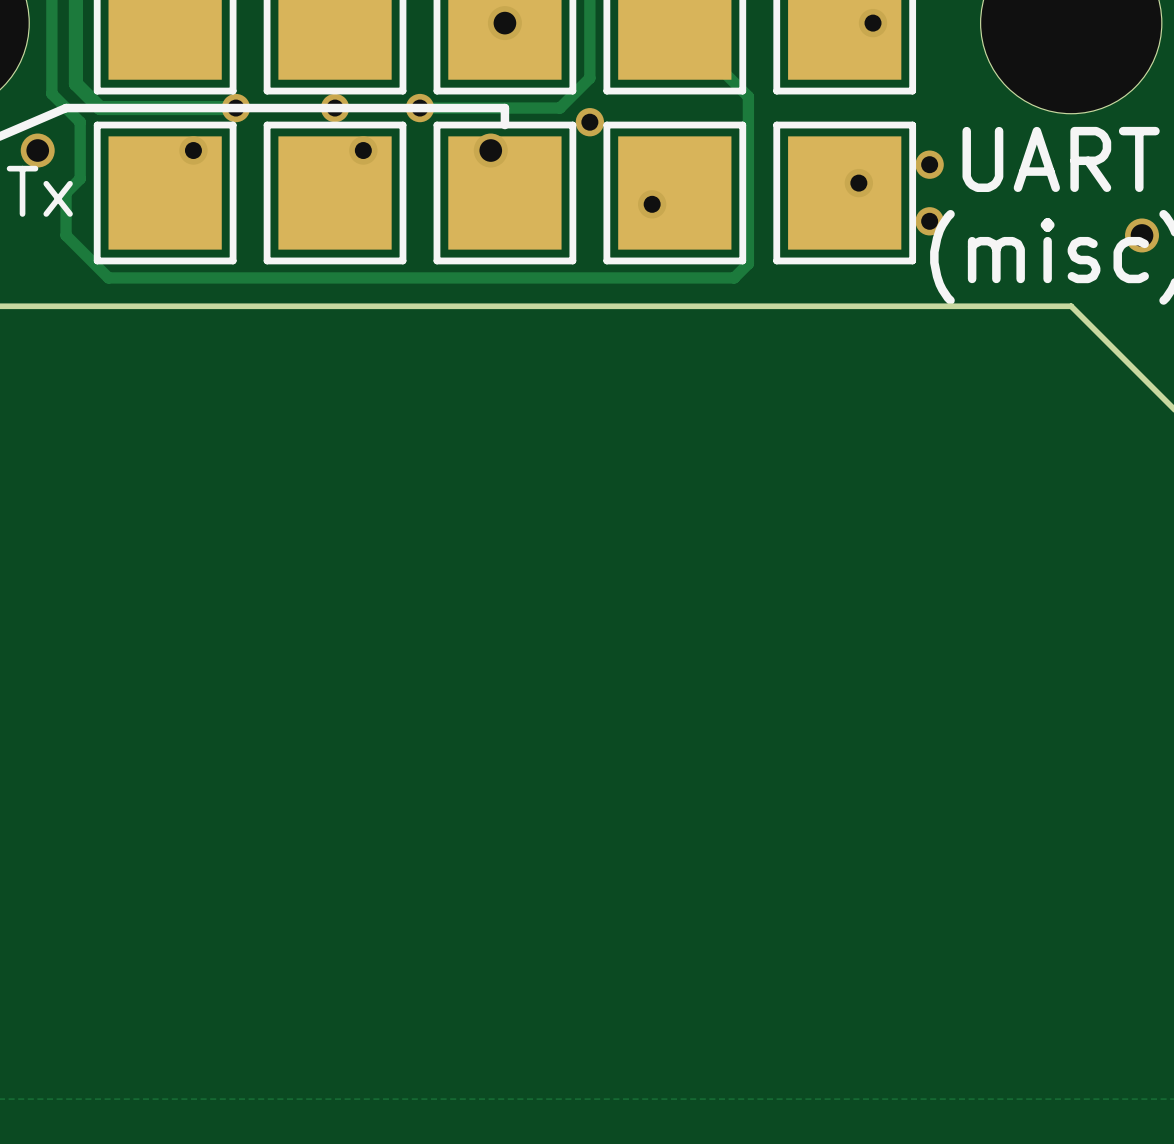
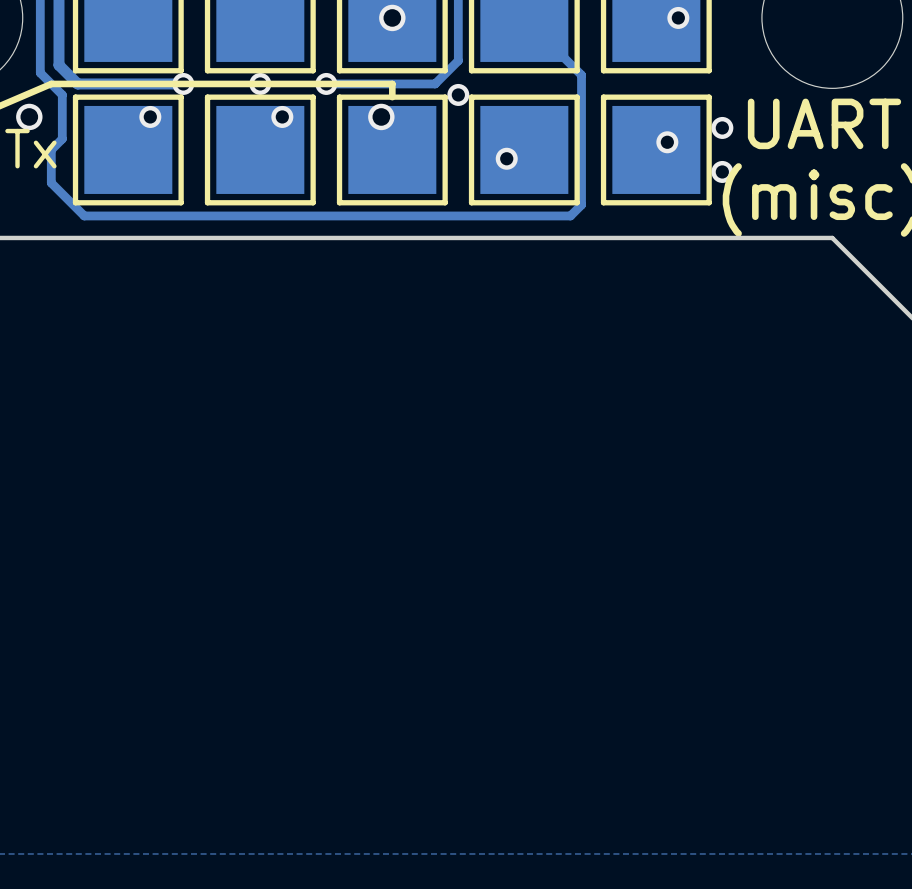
via: (1142, 235) -> none

